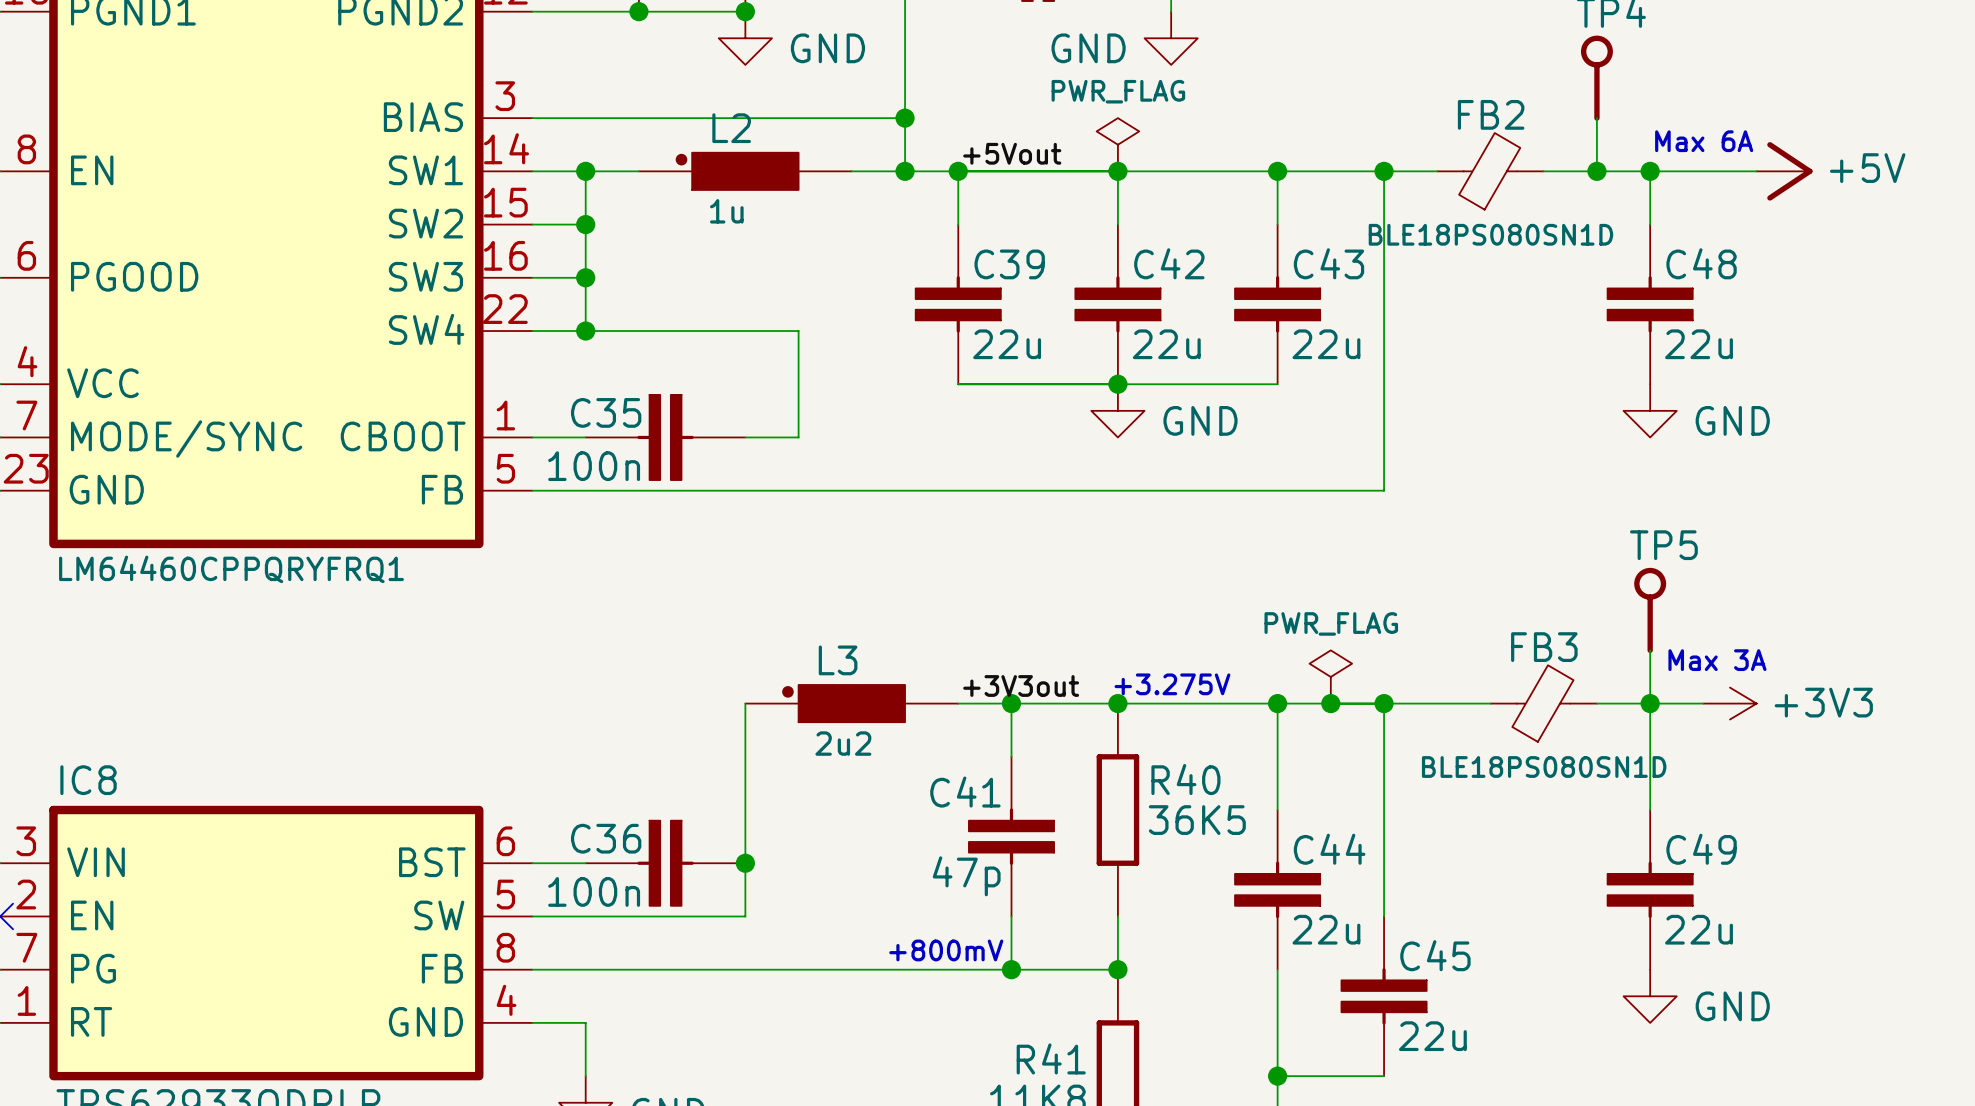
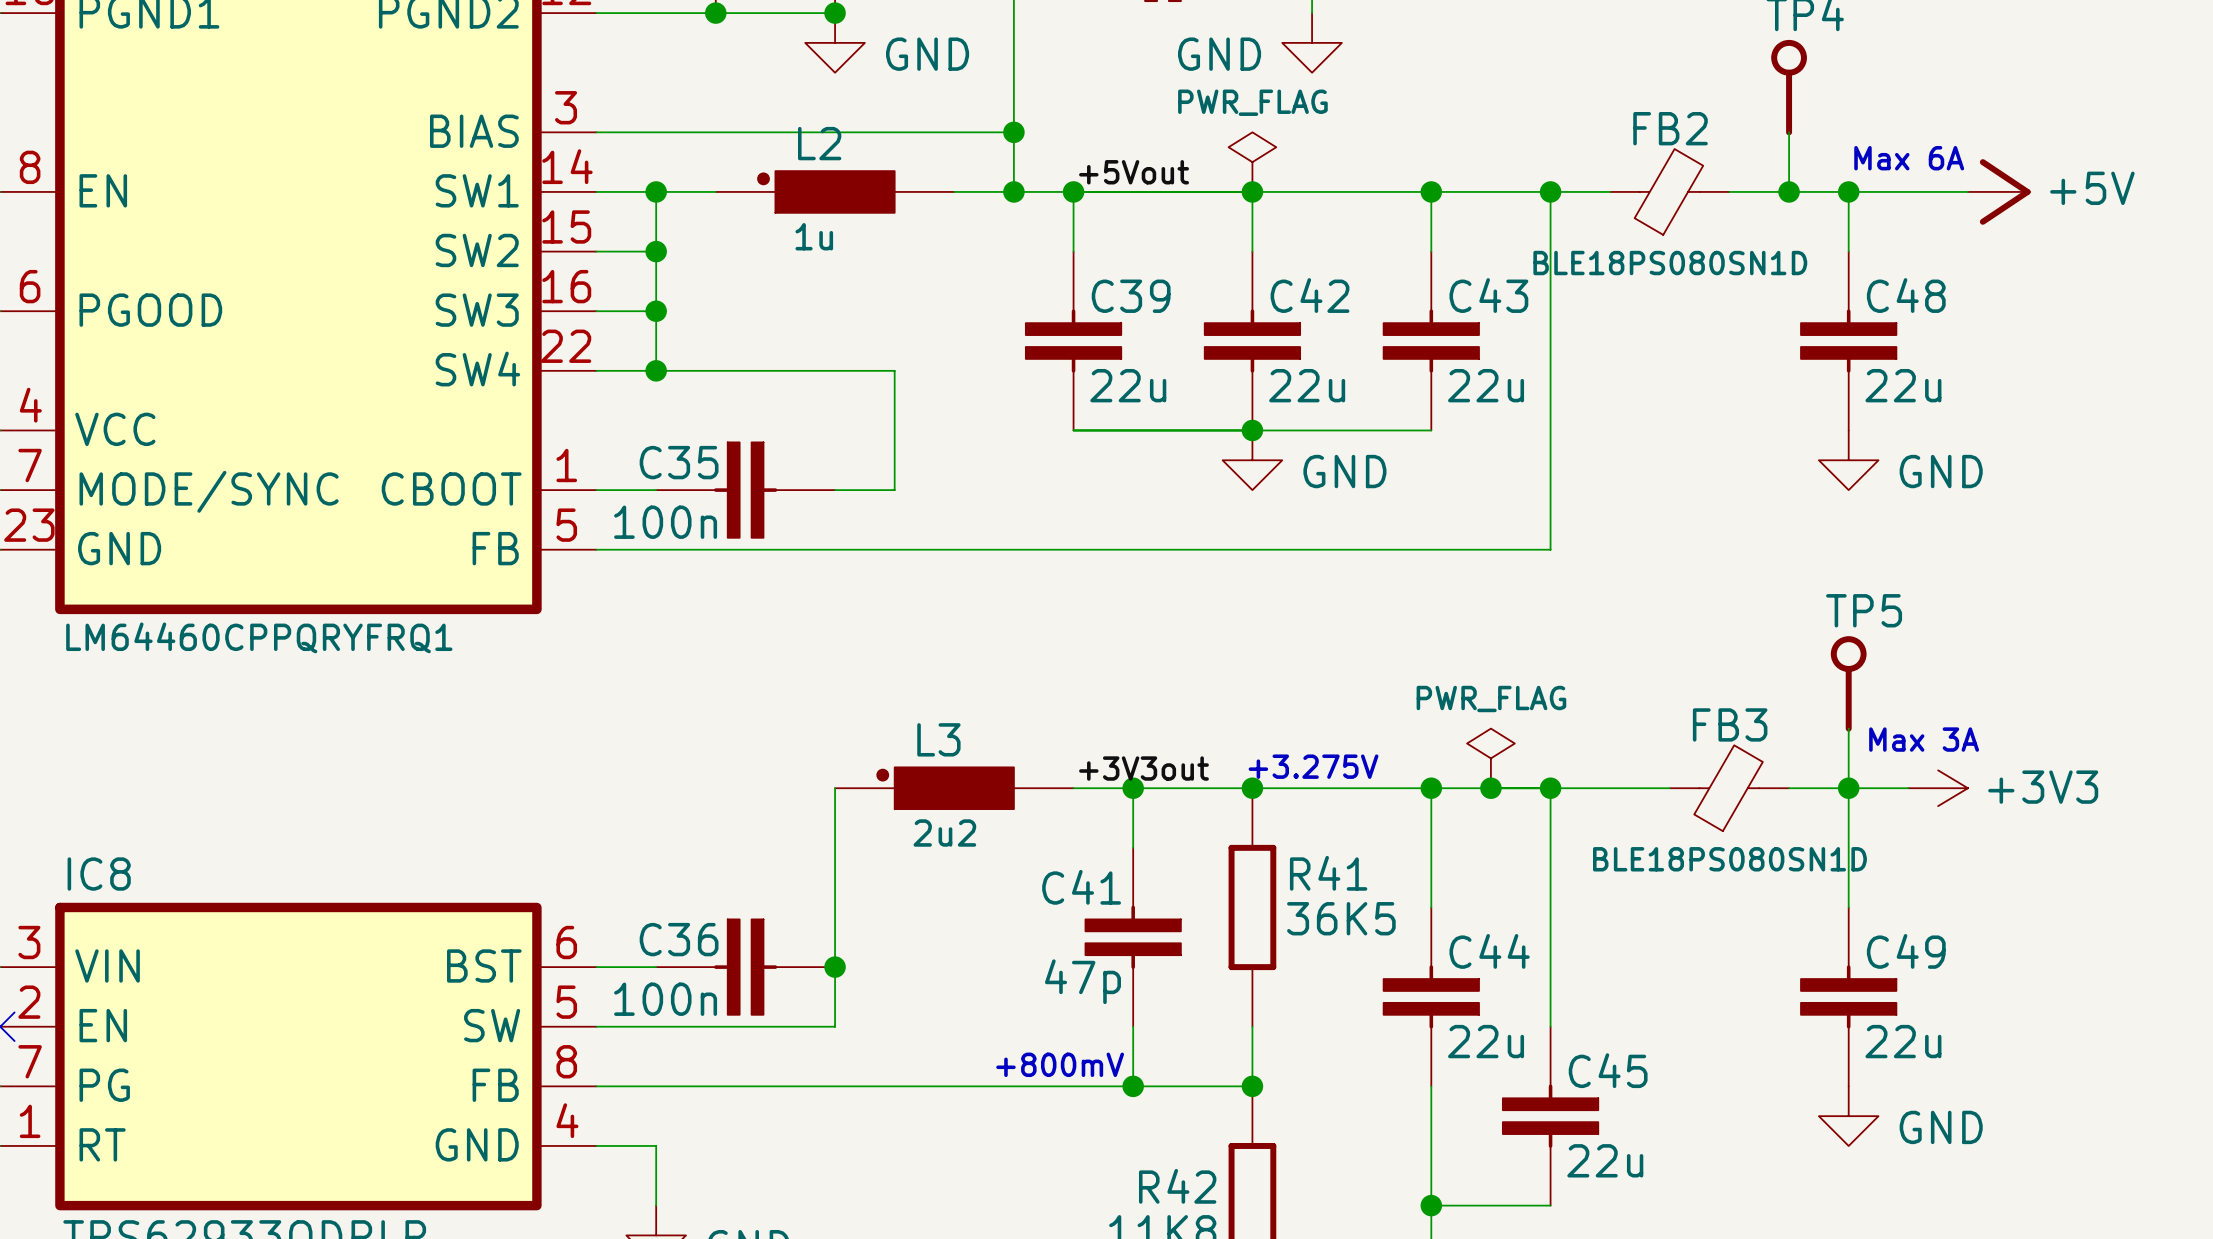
R40 name: R40 (1185, 779) -> R41 (1328, 873)
R41 name: R41 (1051, 1058) -> R42 (1177, 1186)

